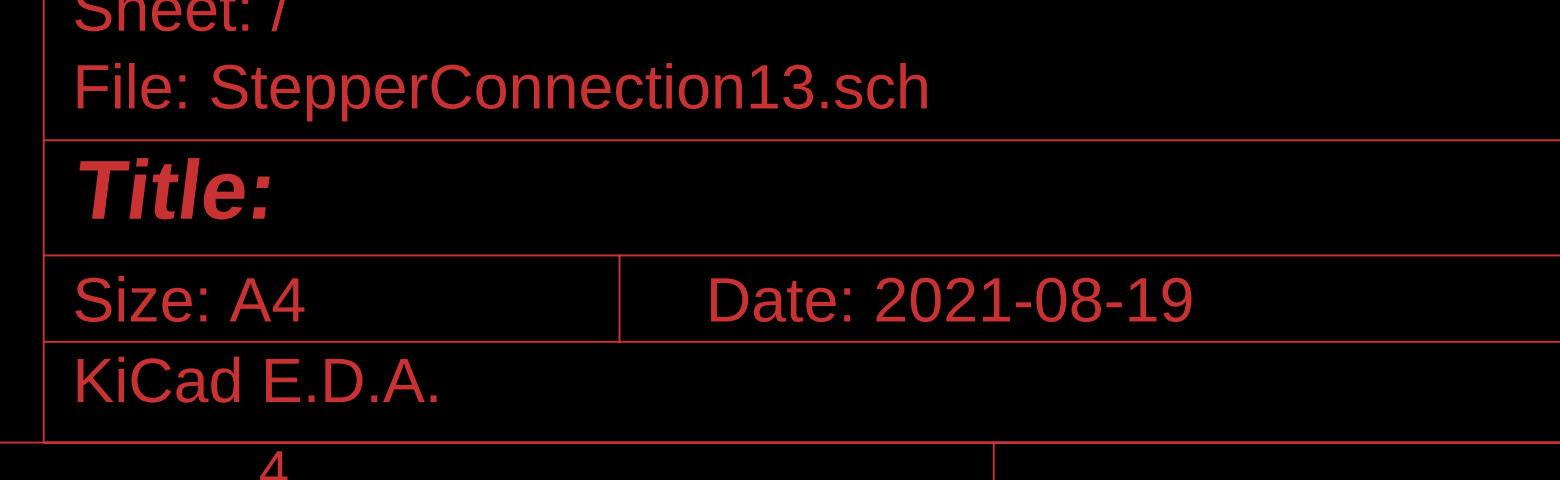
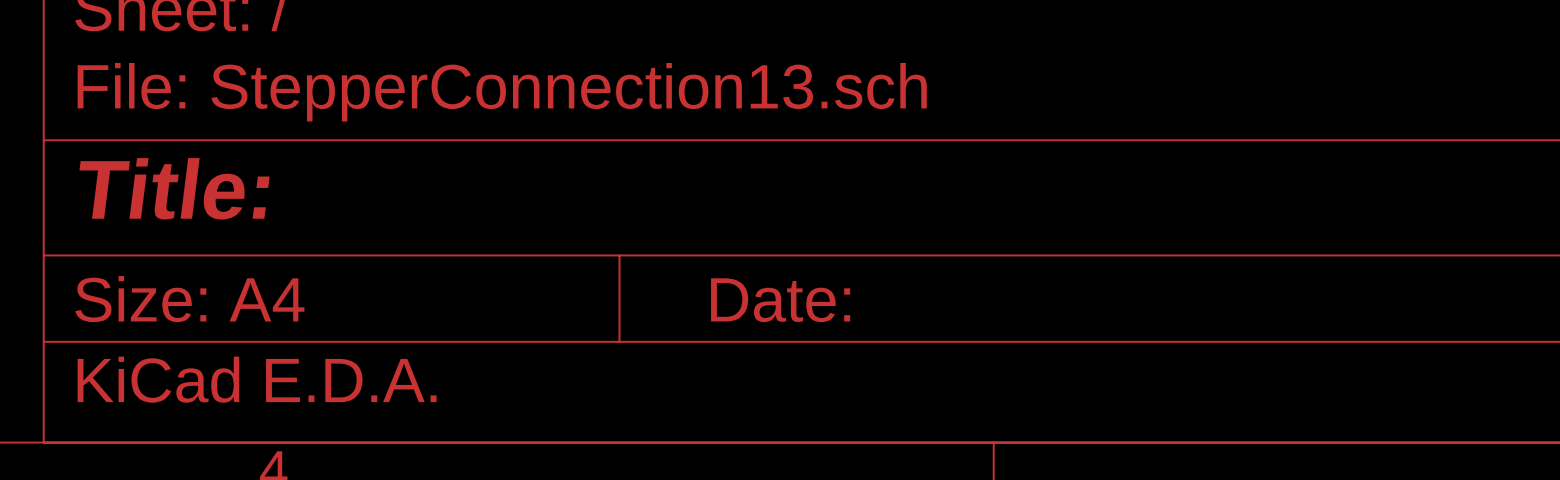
title block: Date: 2021-08-19 (951, 299) -> Date: (780, 300)

